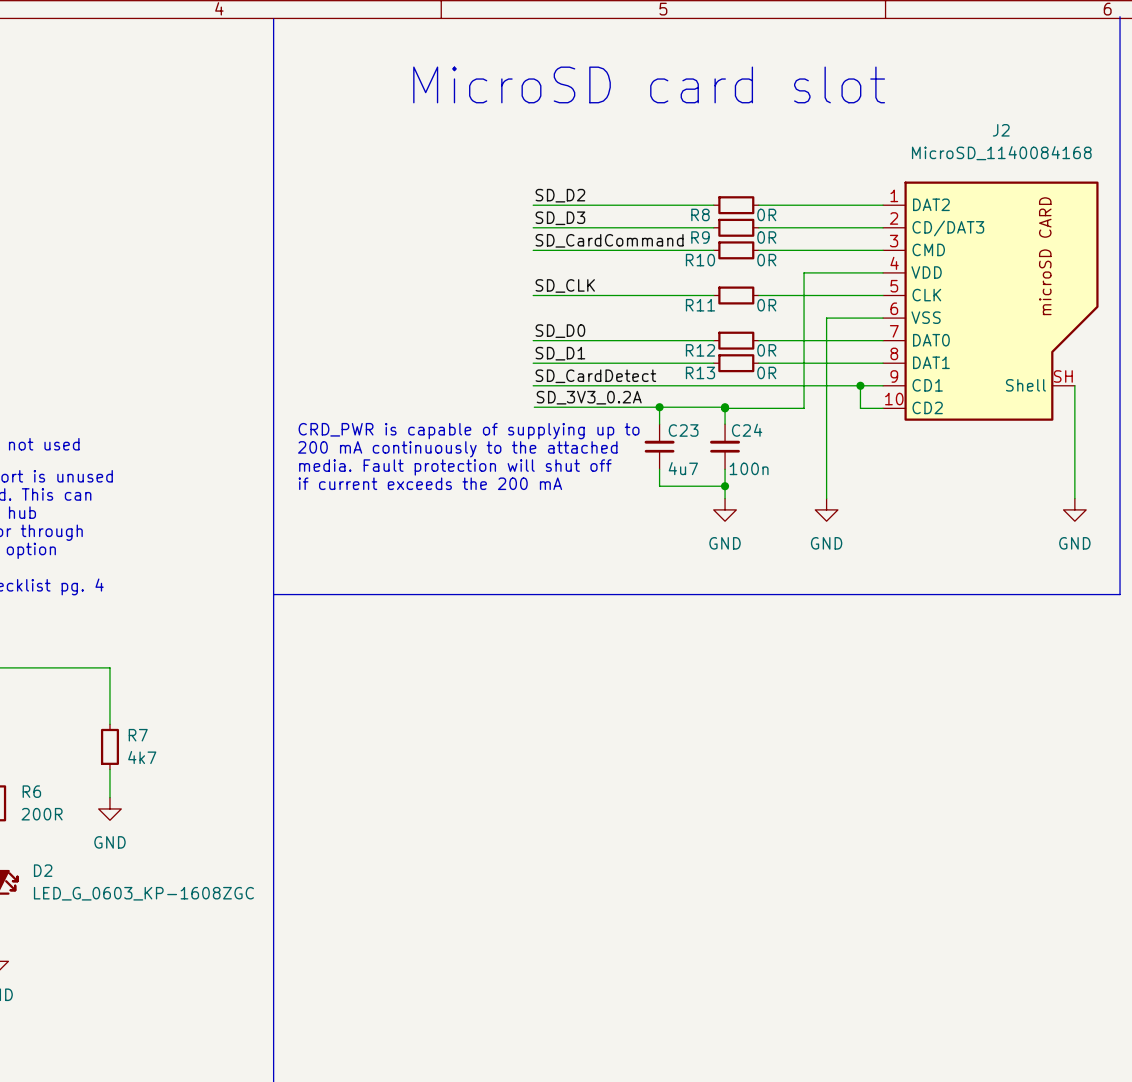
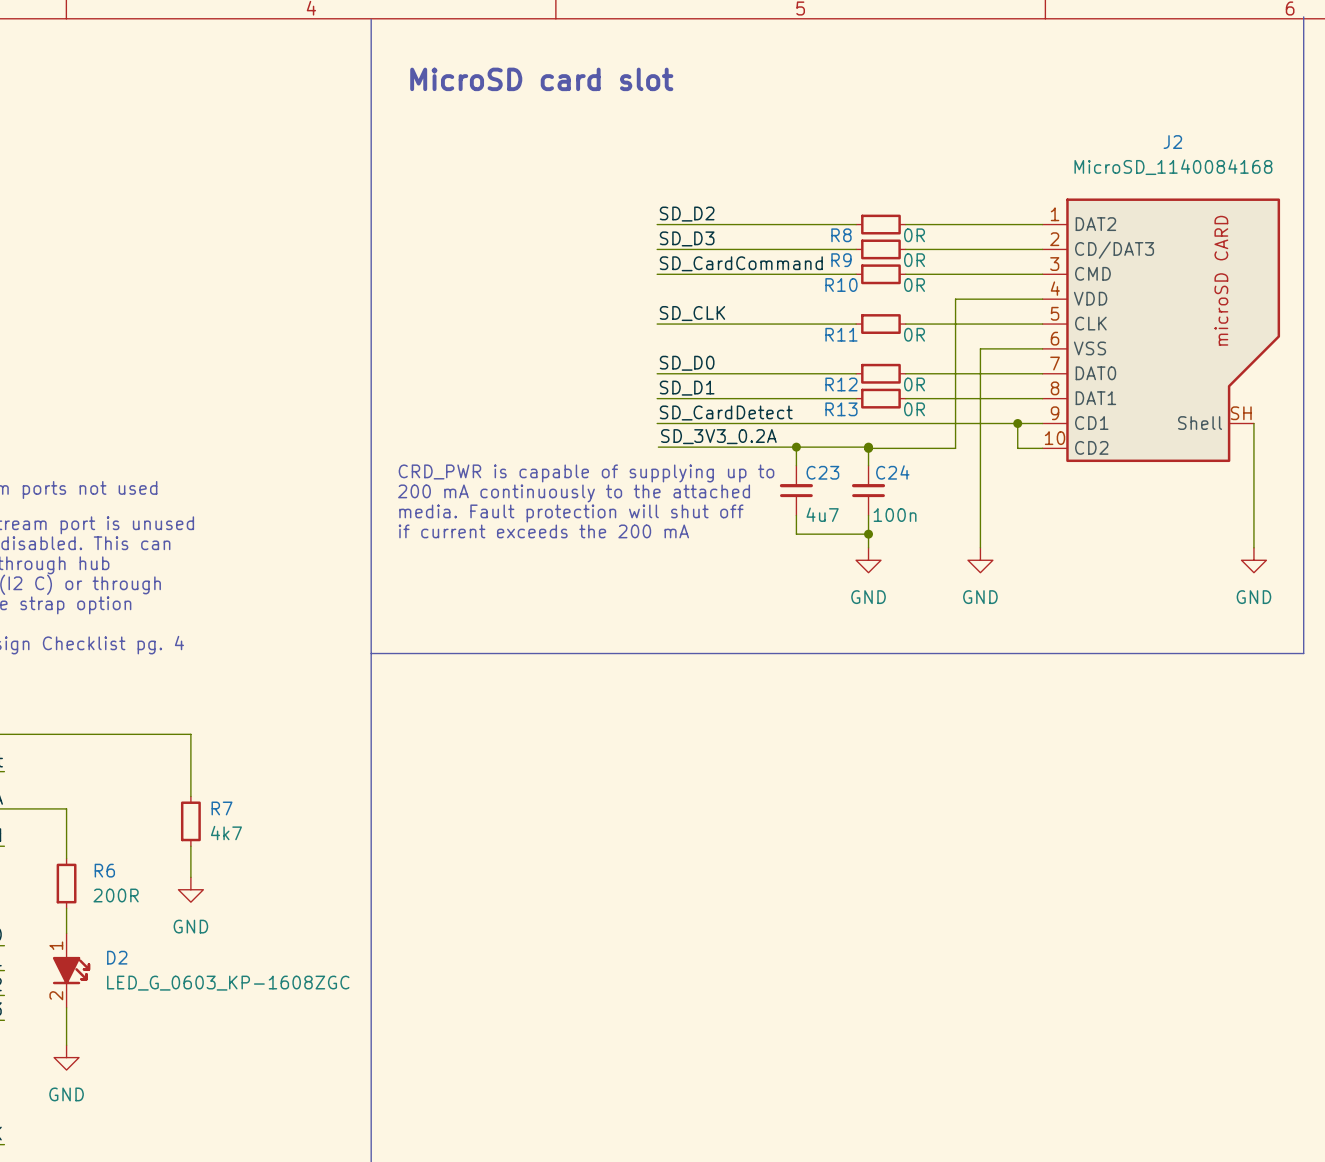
text: none -> MicroSD card slot (541, 79)
text: MicroSD card slot (649, 84) -> none

